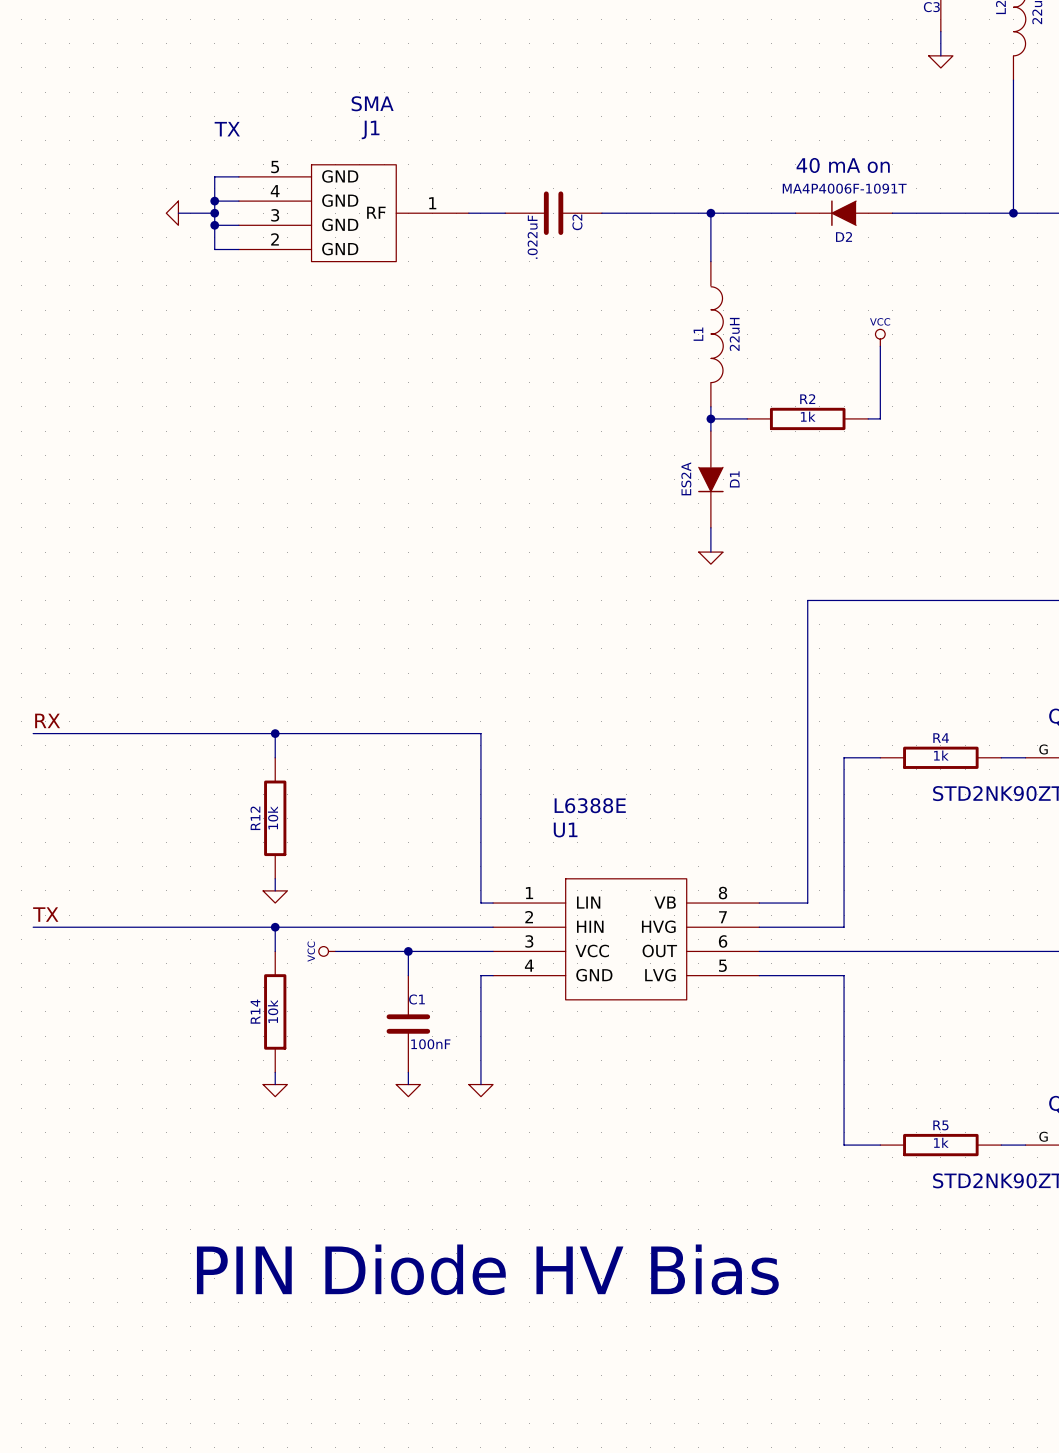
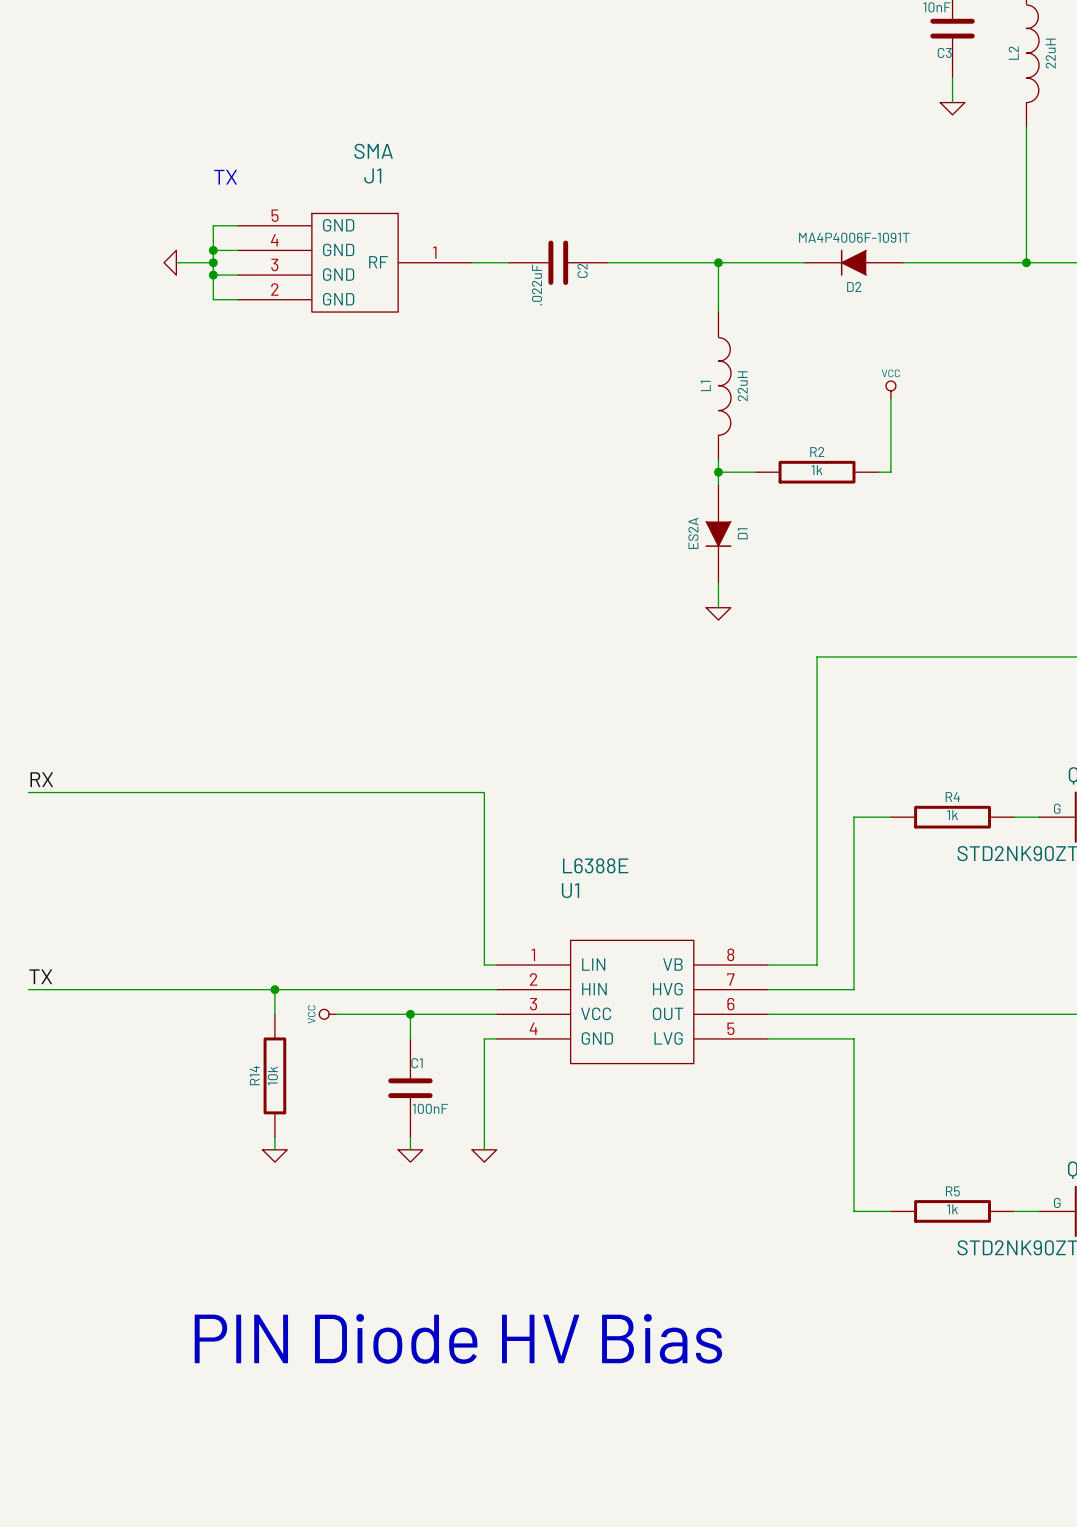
text: 40 mA on (843, 165) -> none
wire: (275, 733) (275, 757) -> none
junction: (275, 733) -> none
R12: 10k (275, 818) -> none
wire: (275, 878) (275, 890) -> none
power symbol: (275, 896) -> none

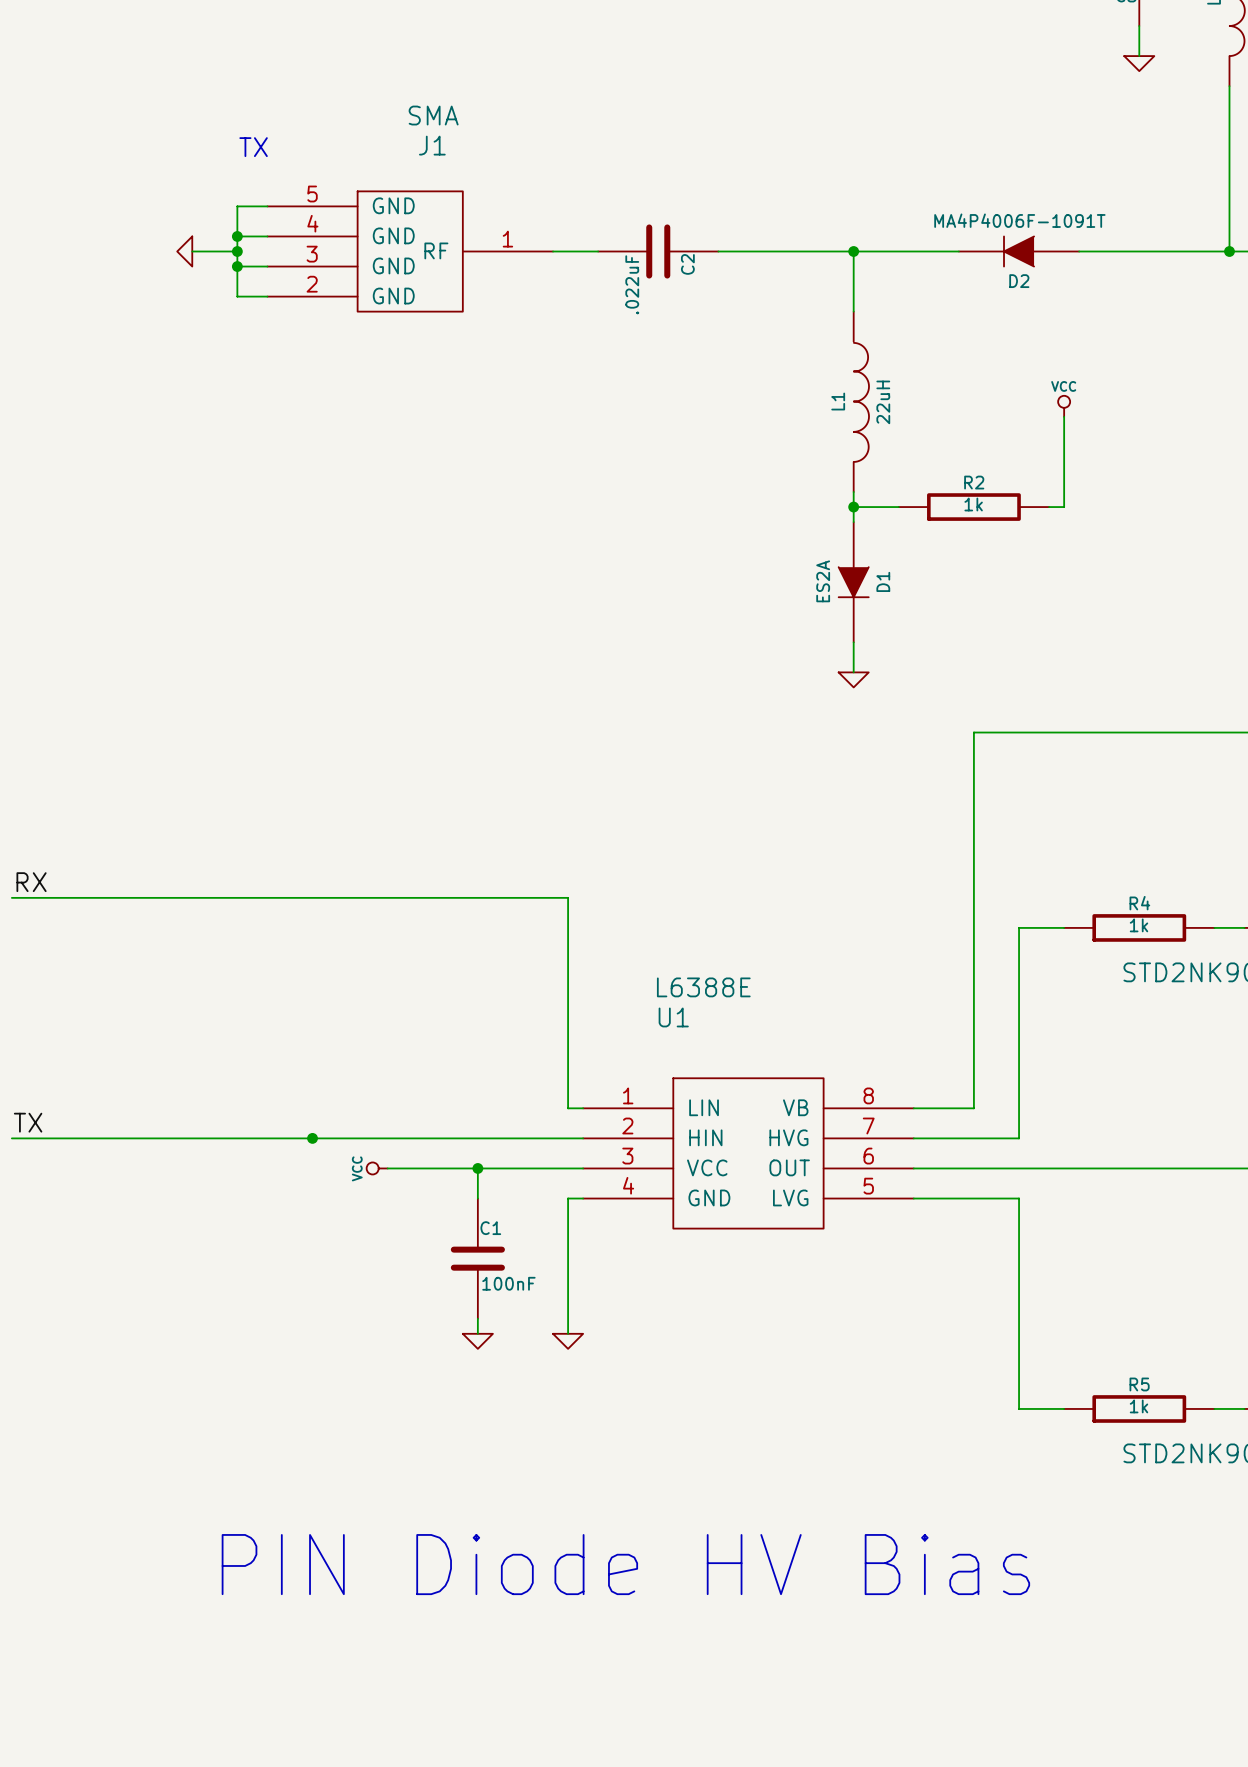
wire: (274, 989) (274, 1014) -> none
R14: 10k (274, 1075) -> none
wire: (274, 1137) (274, 1149) -> none
power symbol: (274, 1155) -> none

